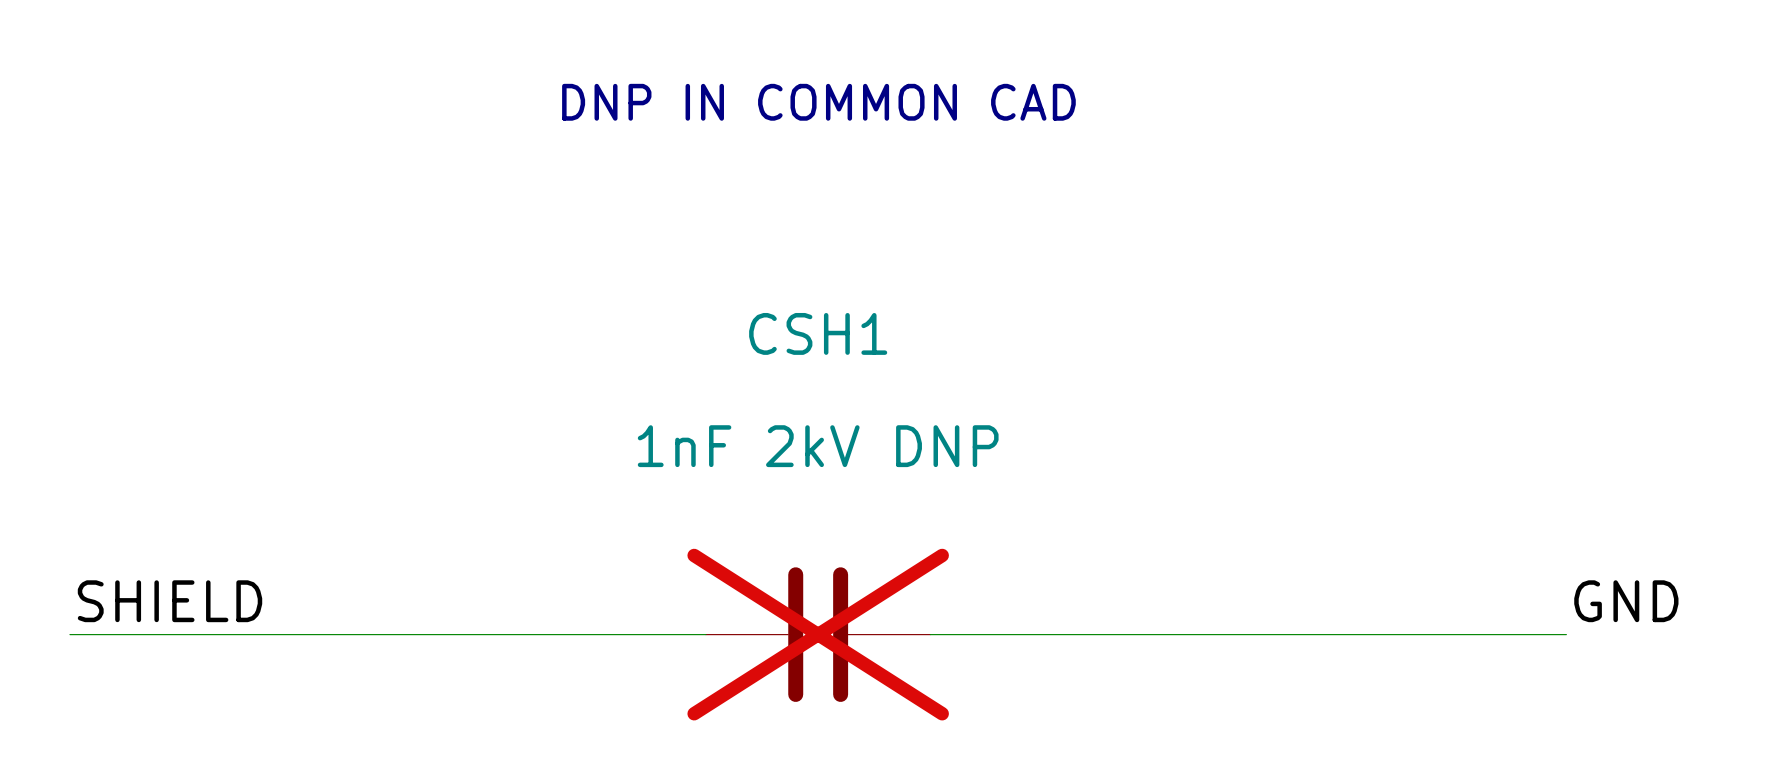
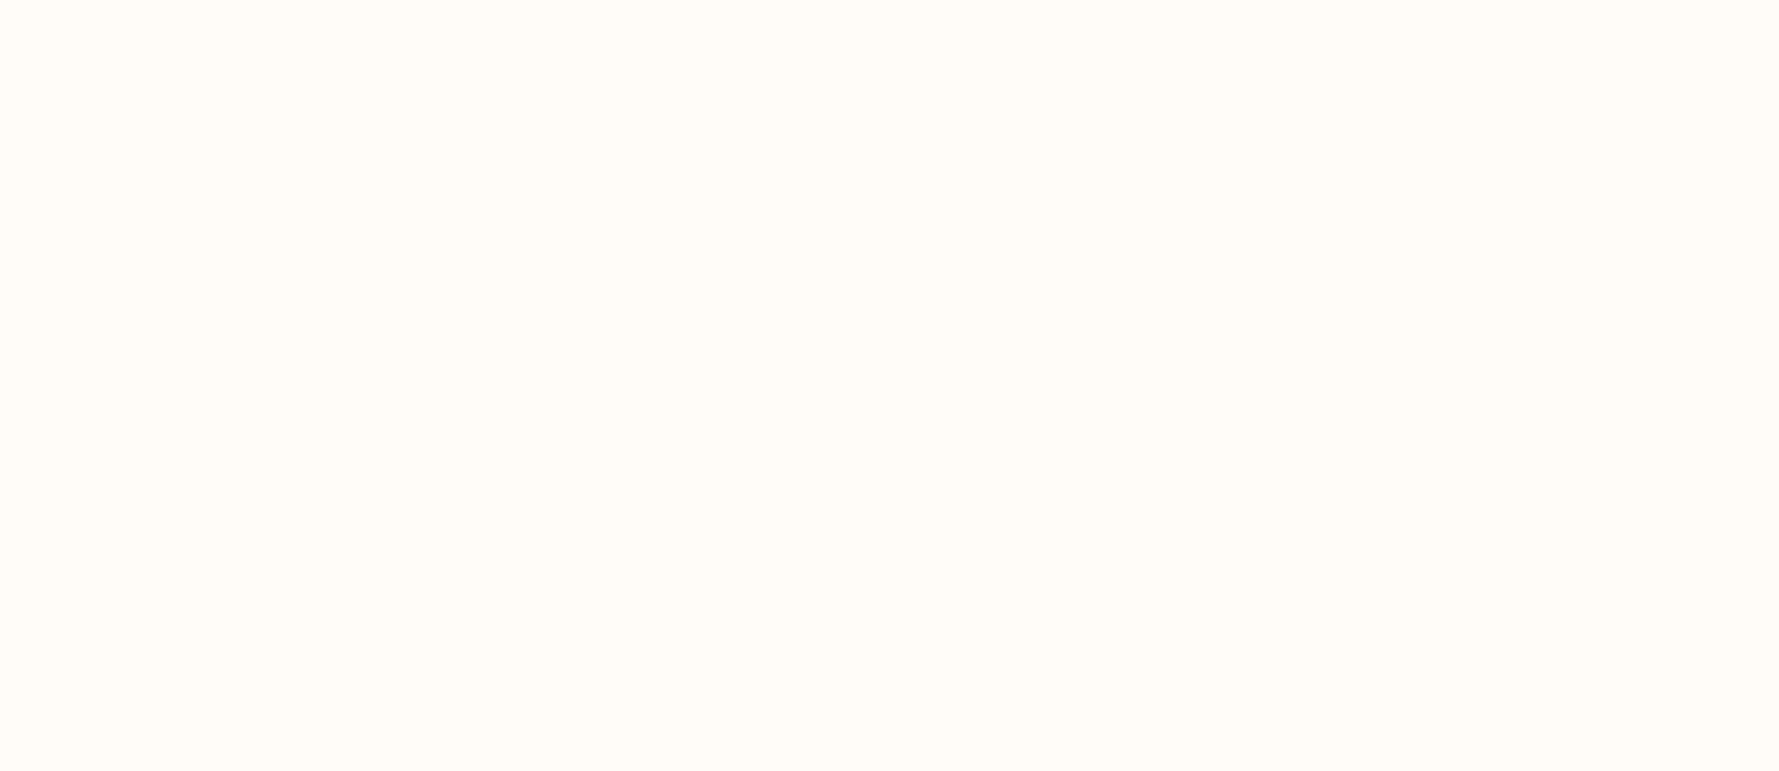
text: DNP IN COMMON CAD (818, 102) -> none
label: SHIELD (170, 601) -> none
label: GND (1626, 601) -> none
wire: (69, 634) (705, 634) -> none
CSH1: 1nF 2kV DNP (818, 634) -> none
wire: (930, 634) (1566, 634) -> none

